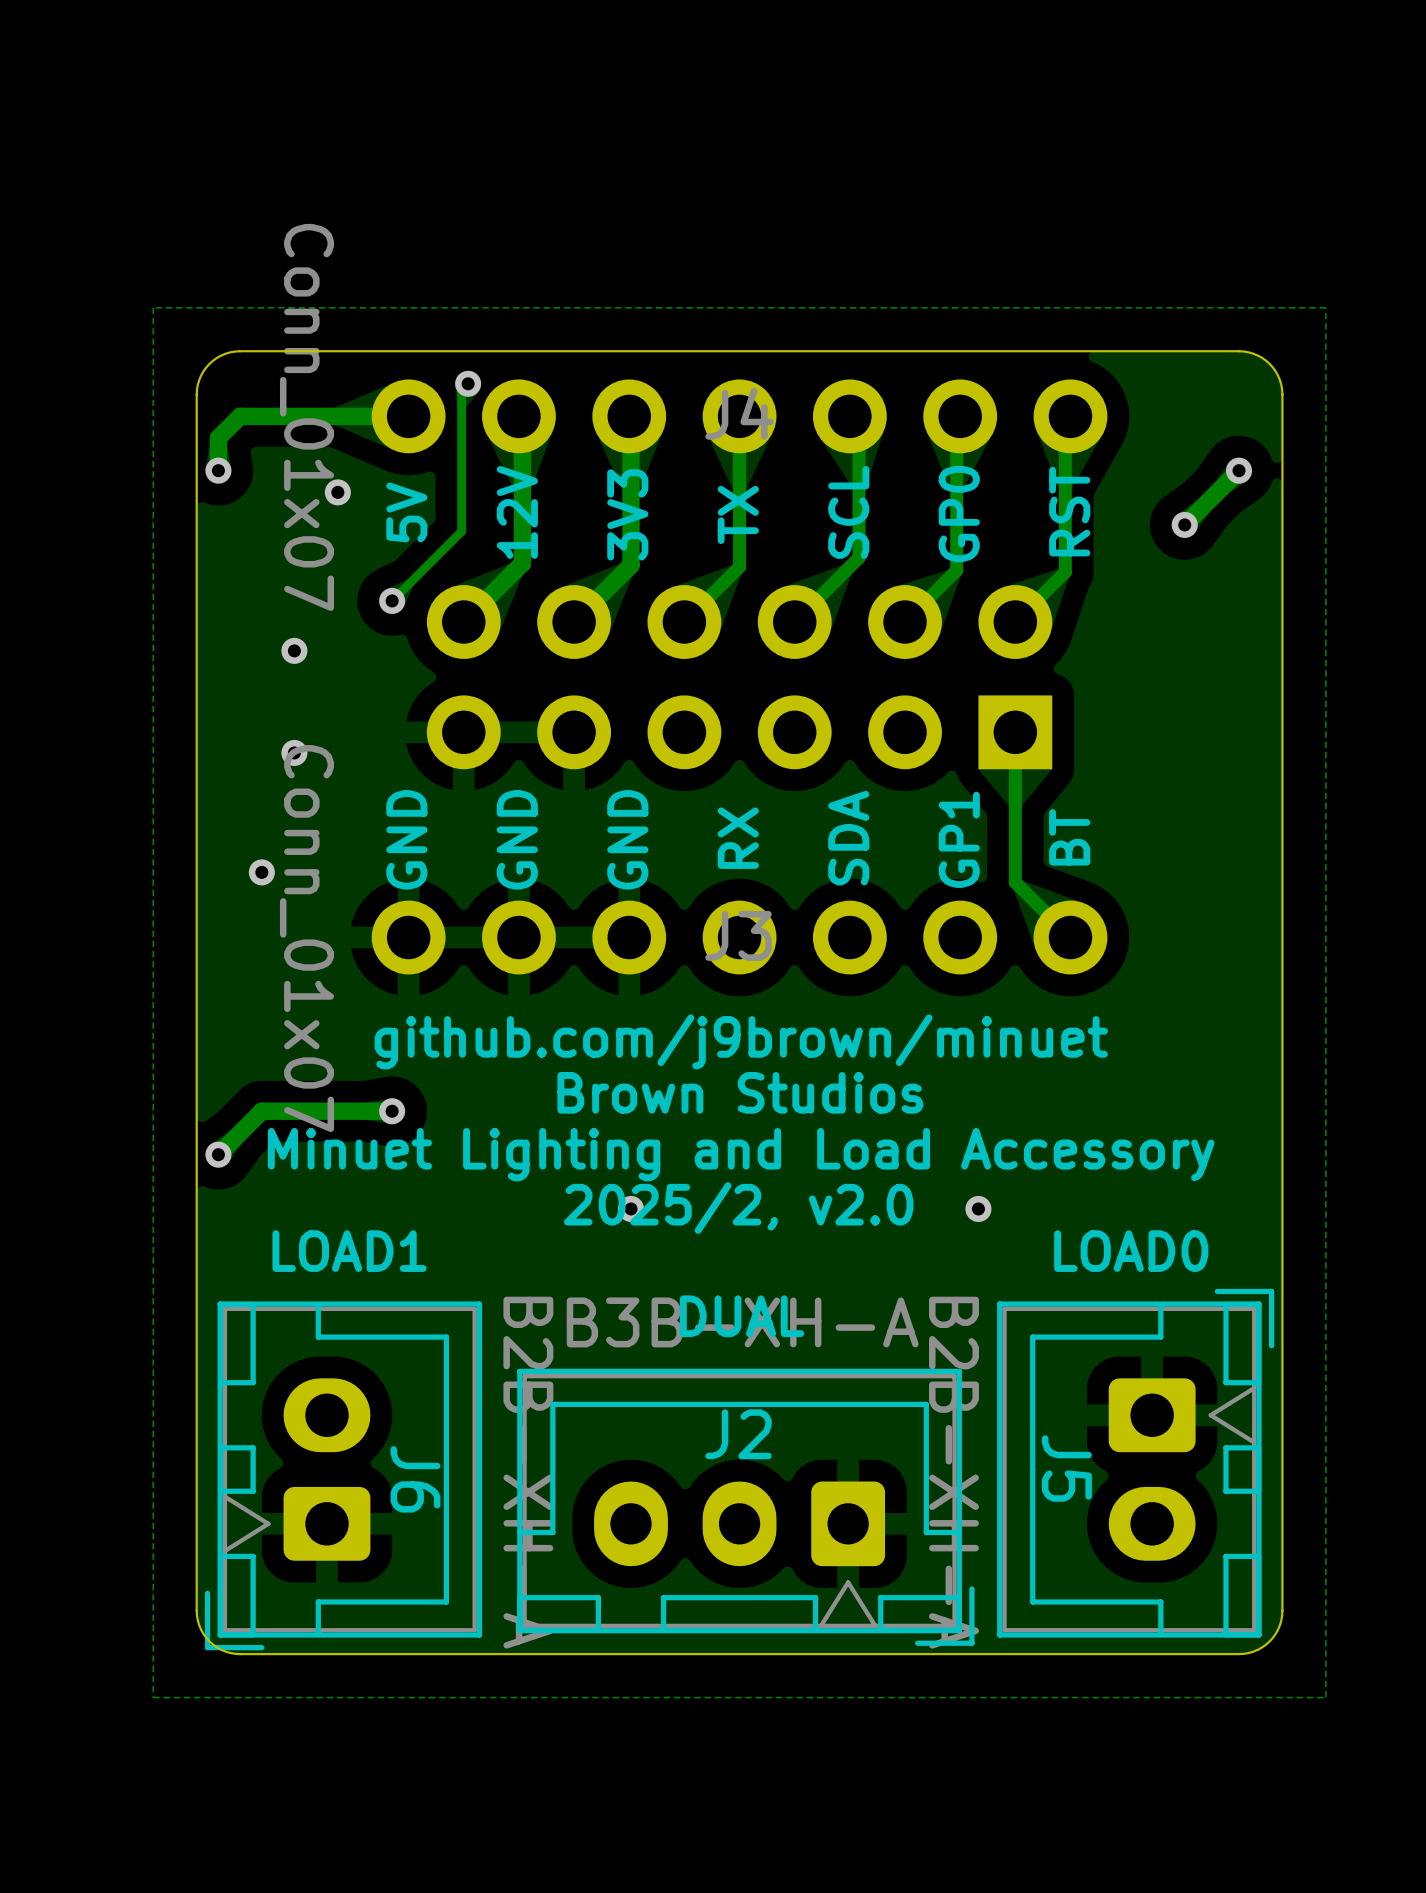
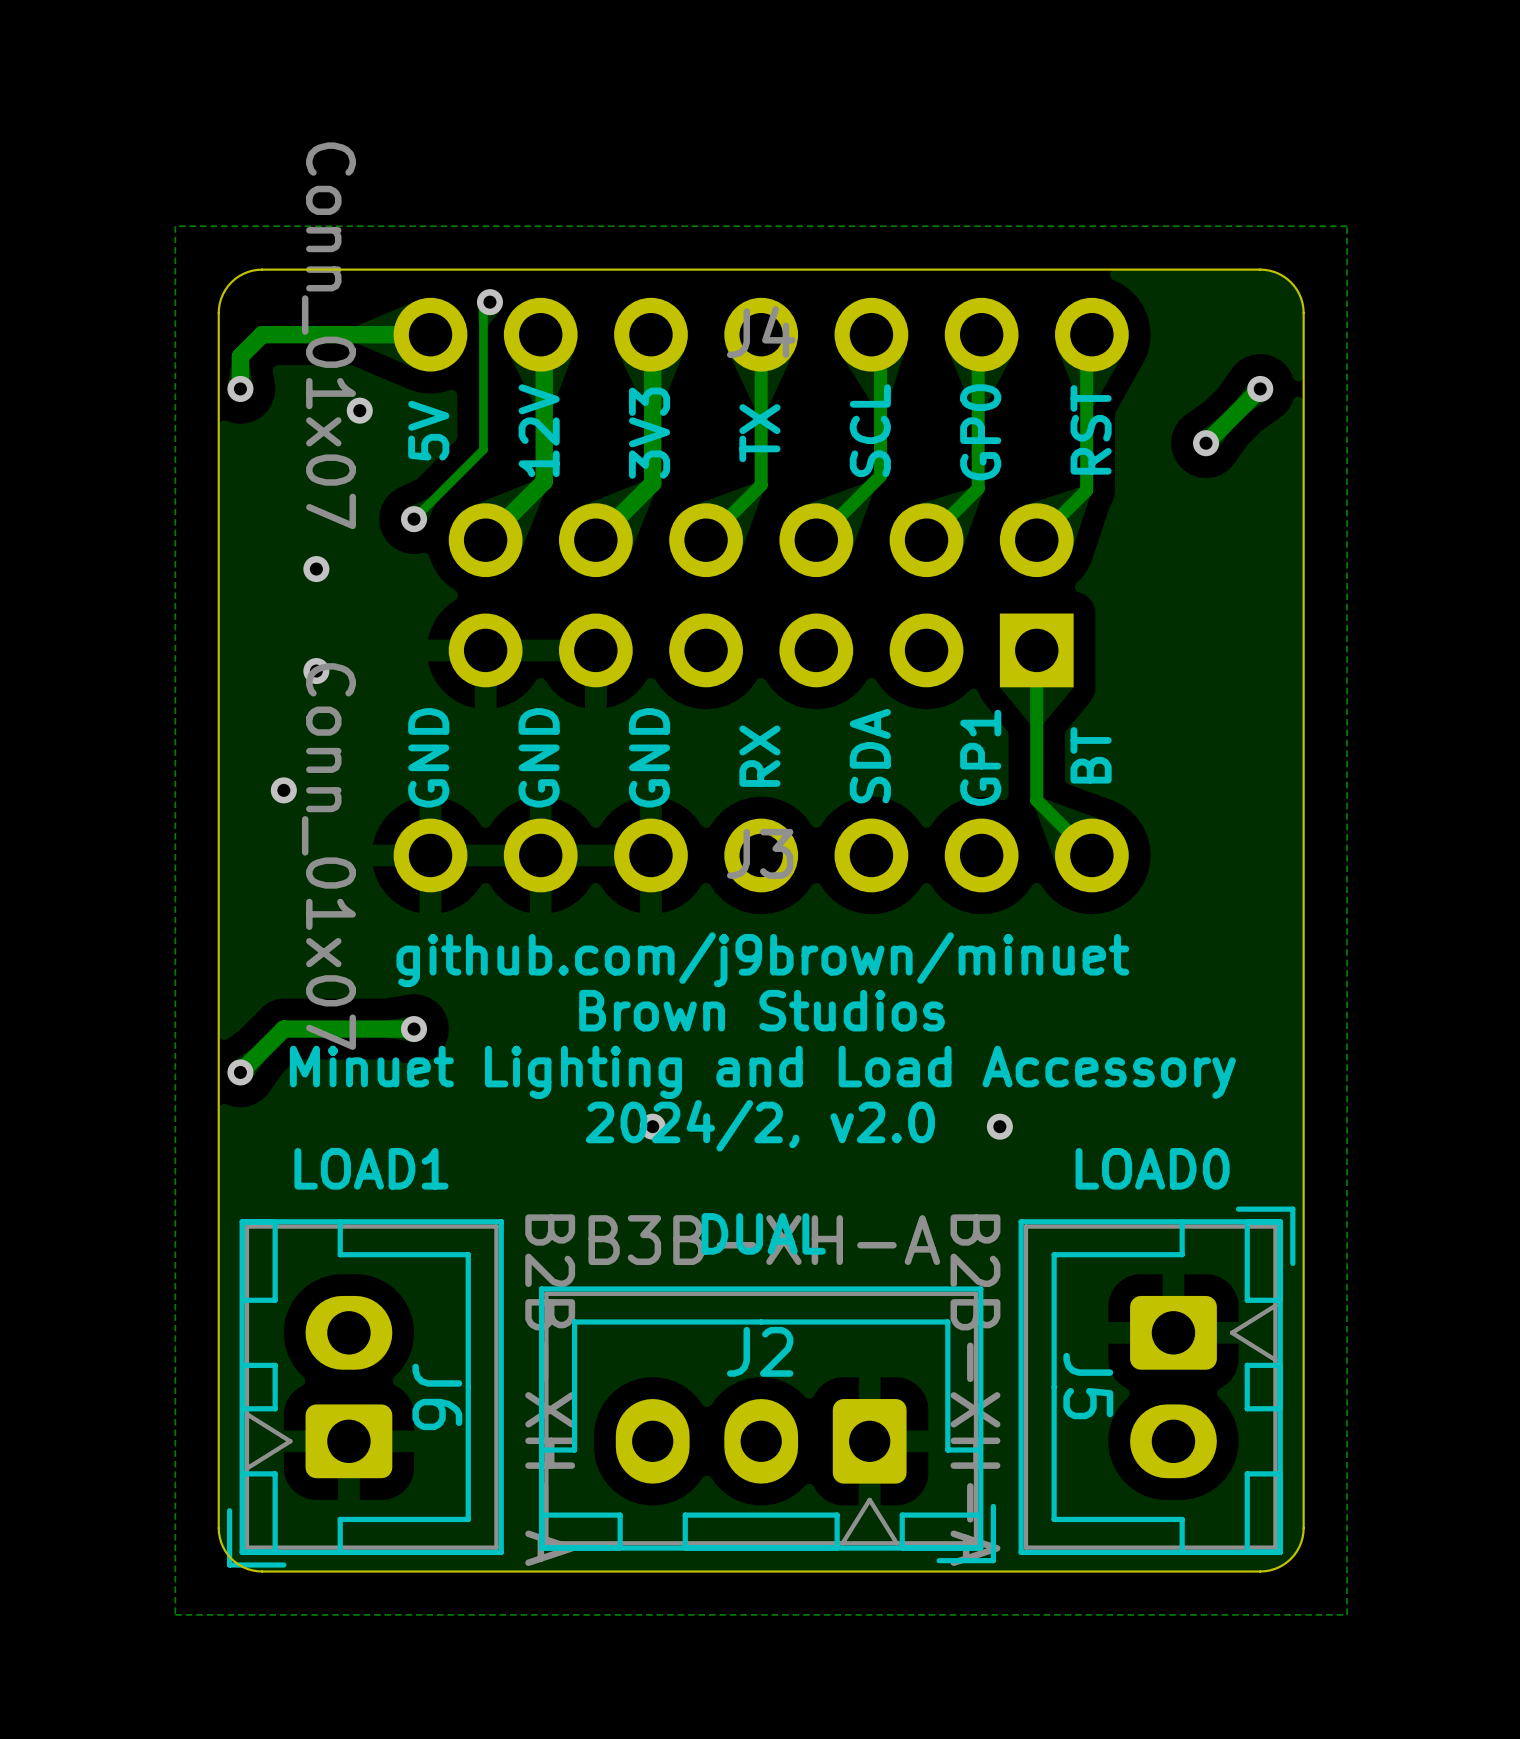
text: 2025/2, v2.0 (738, 1208) -> 2024/2, v2.0 (760, 1125)

